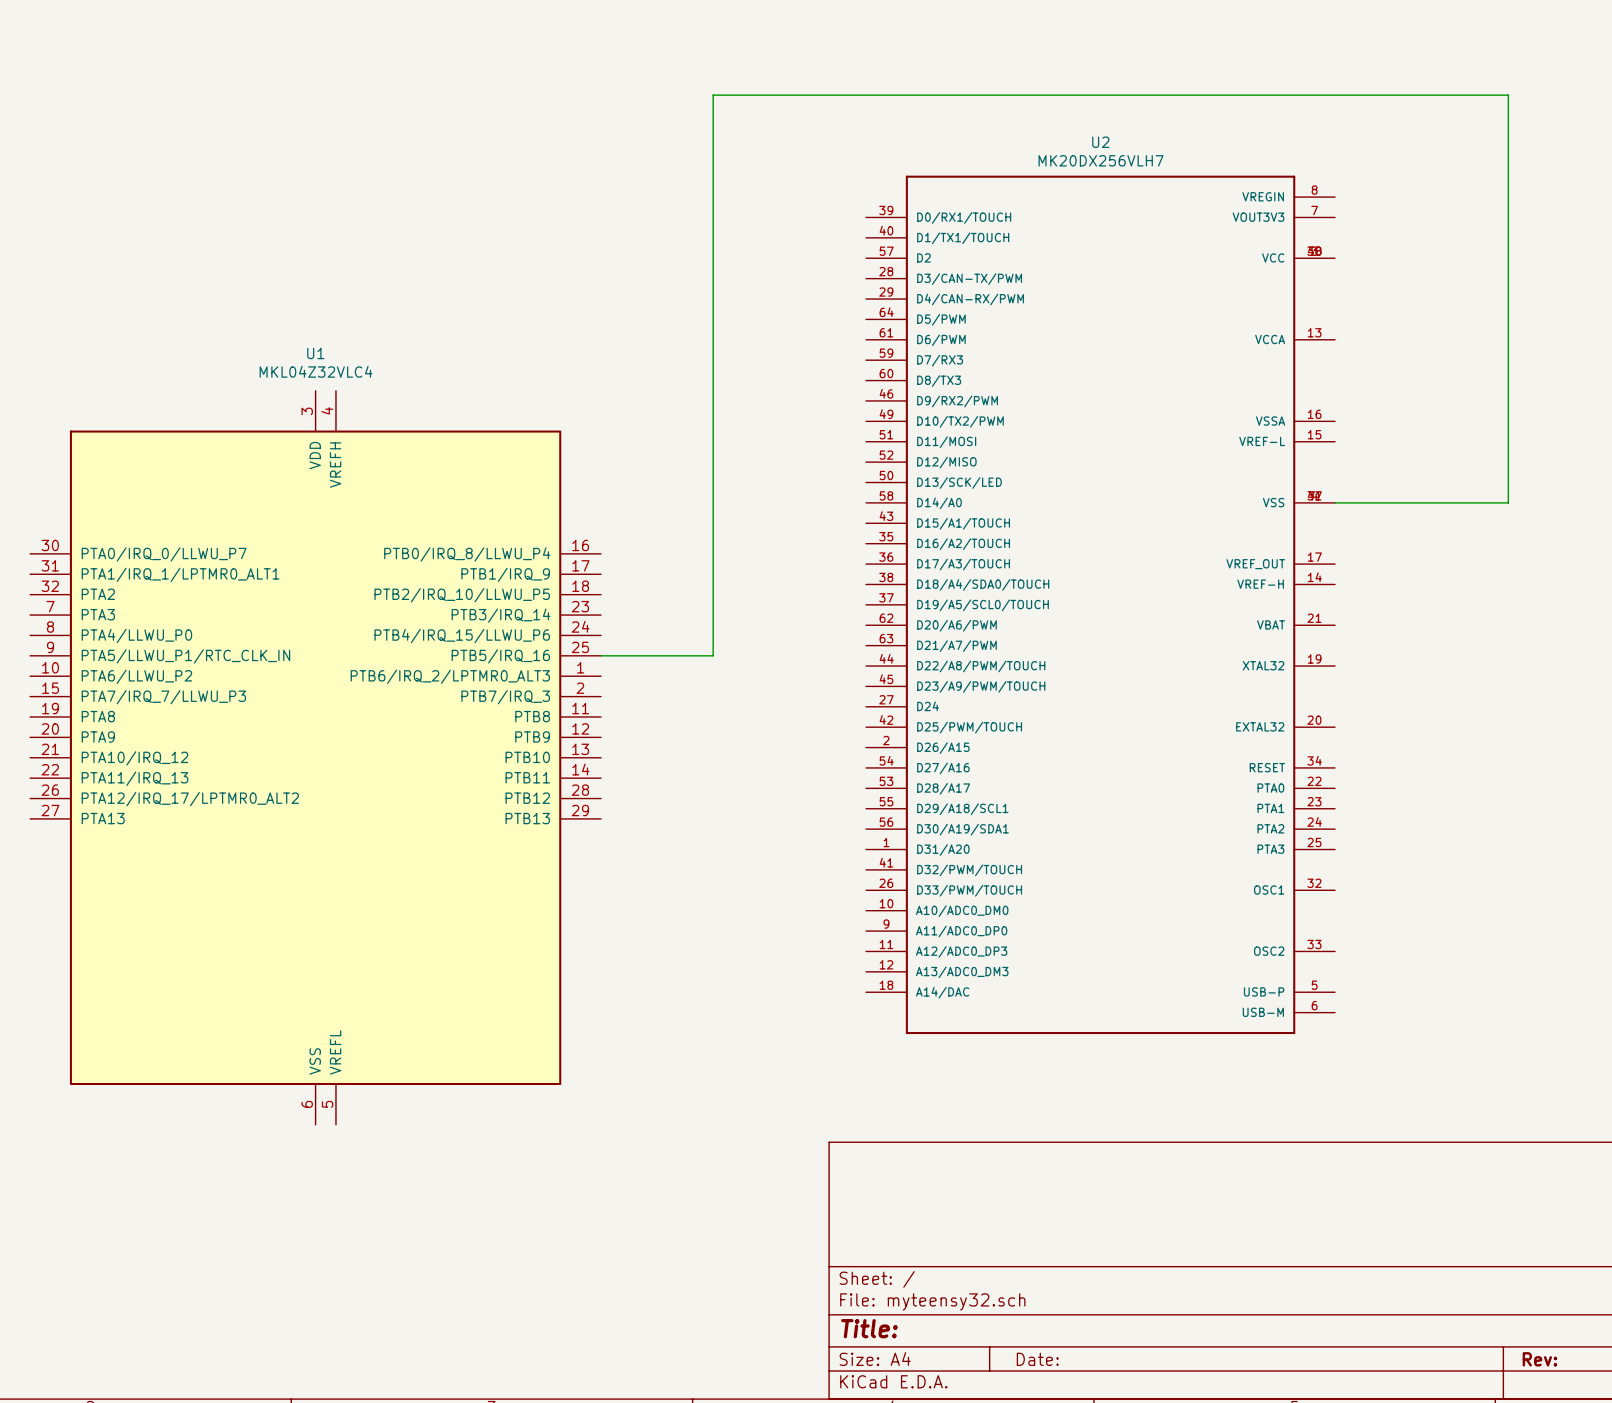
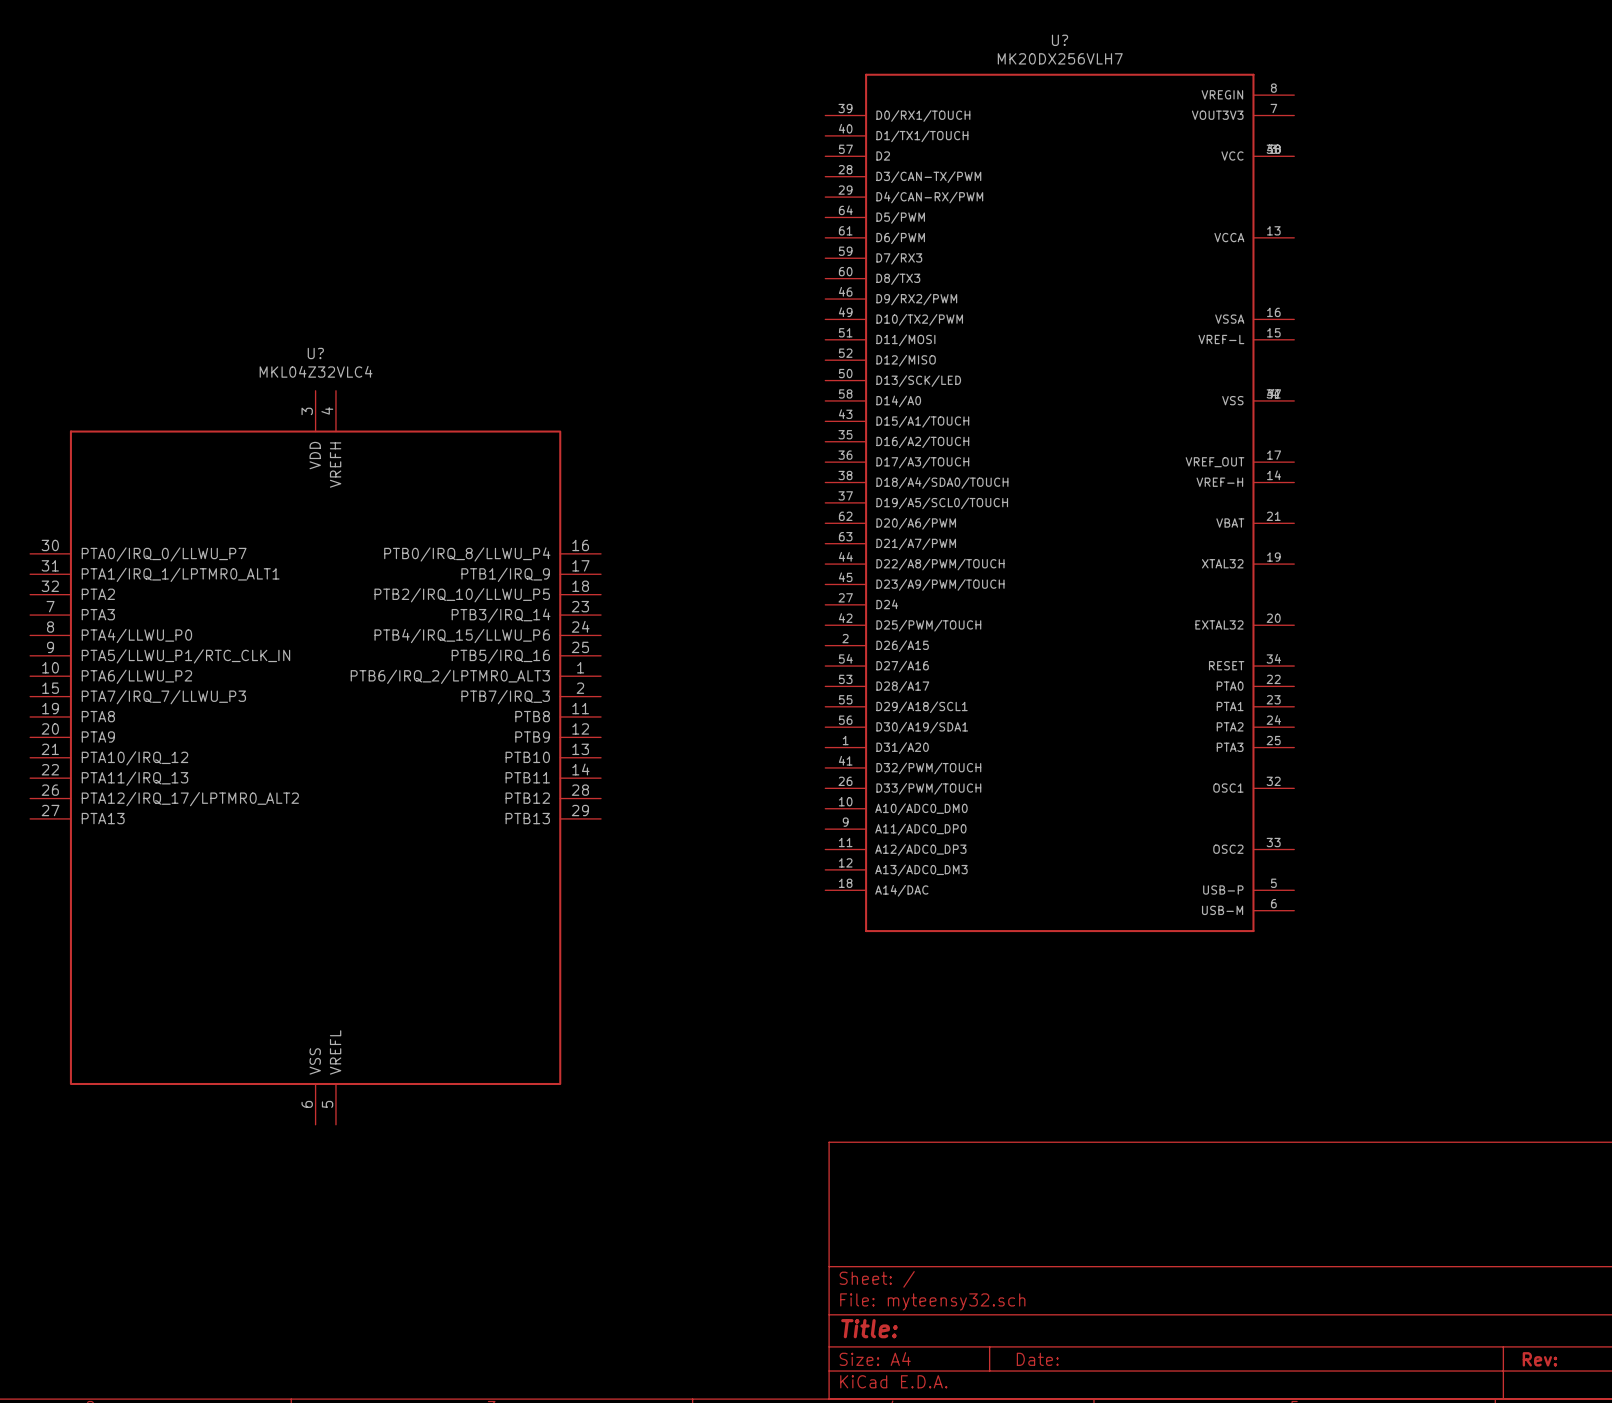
U1 name: U1 (315, 353) -> U? (315, 353)
U?: none -> MK20DX256VLH7 (1059, 502)
wire: (1335, 502) (1508, 502) (1508, 95) (713, 95) (713, 655) (601, 655) -> none
U2: MK20DX256VLH7 (1100, 604) -> none

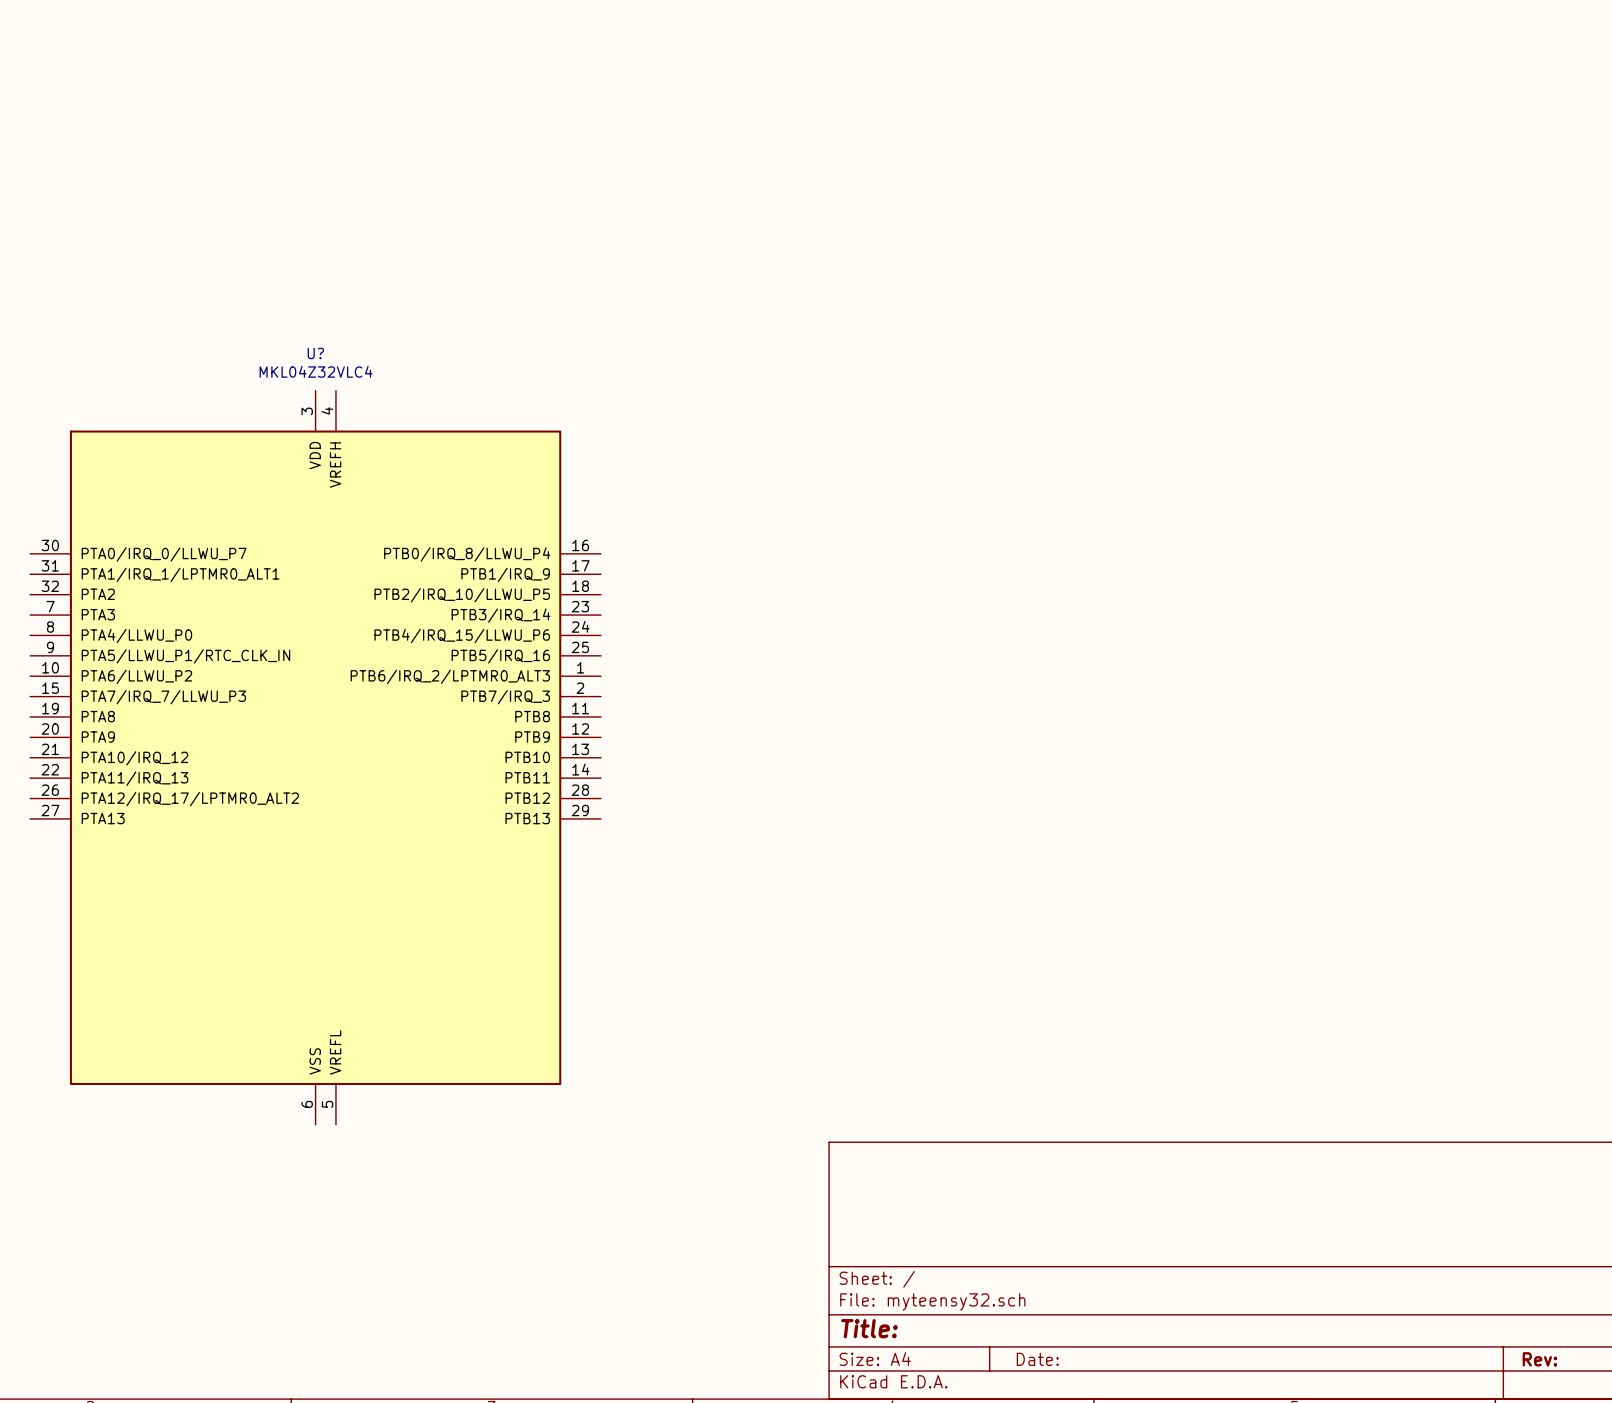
U?: MK20DX256VLH7 (1059, 502) -> none

